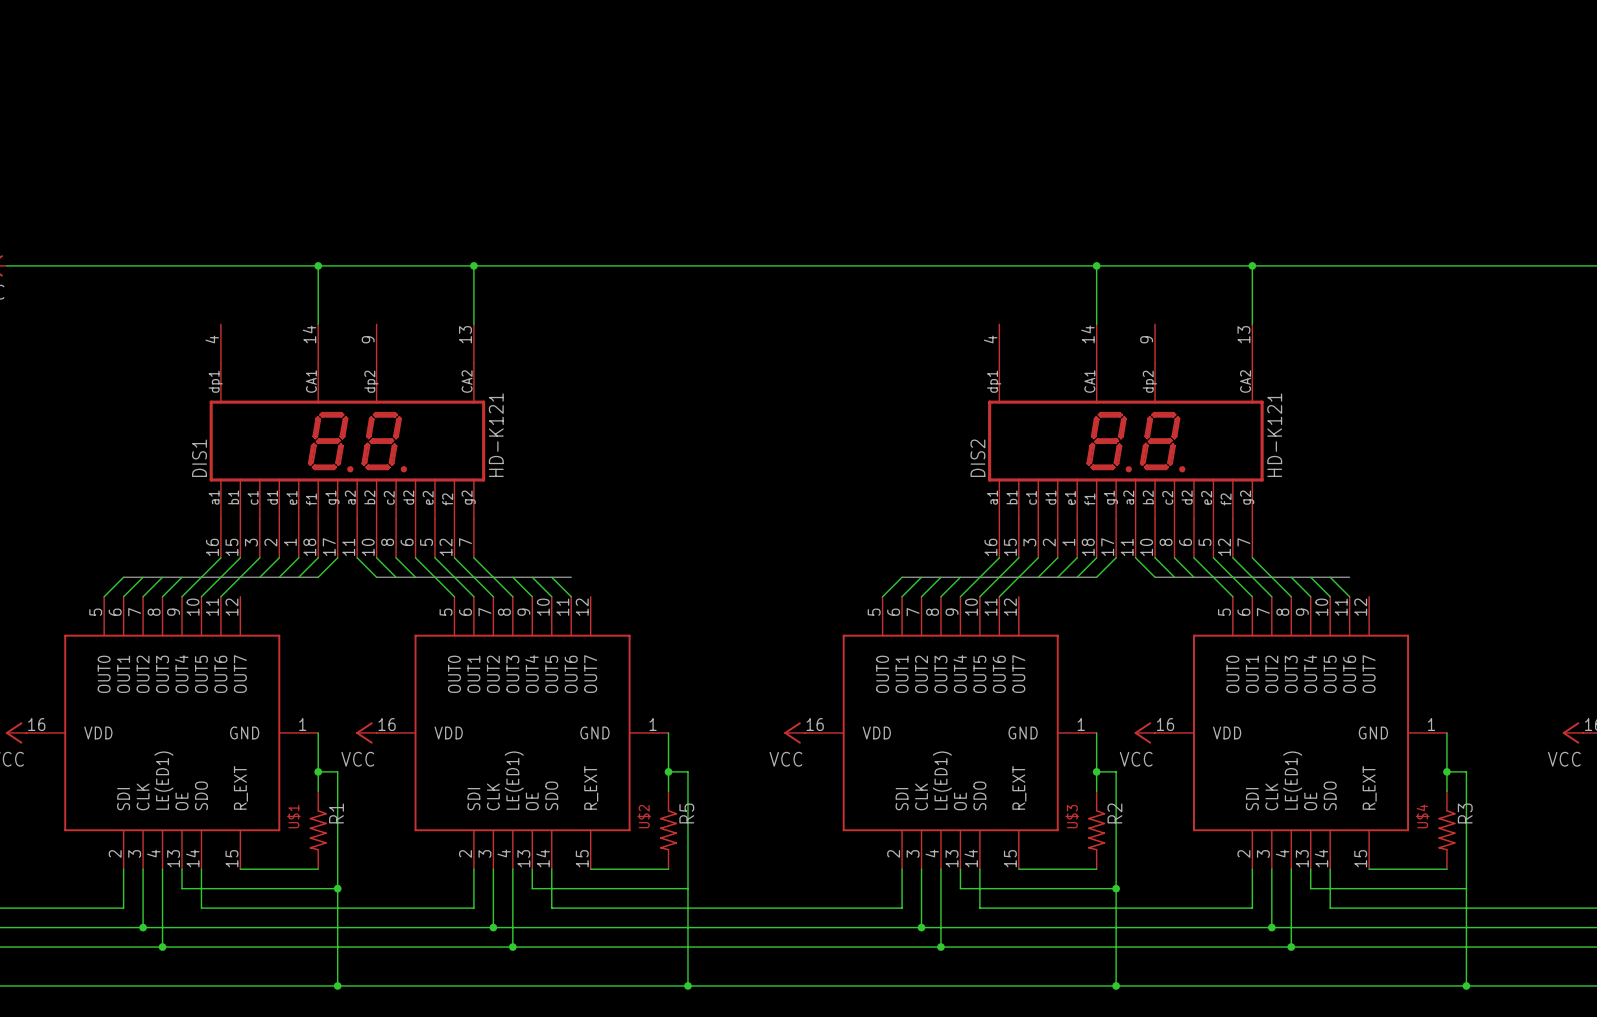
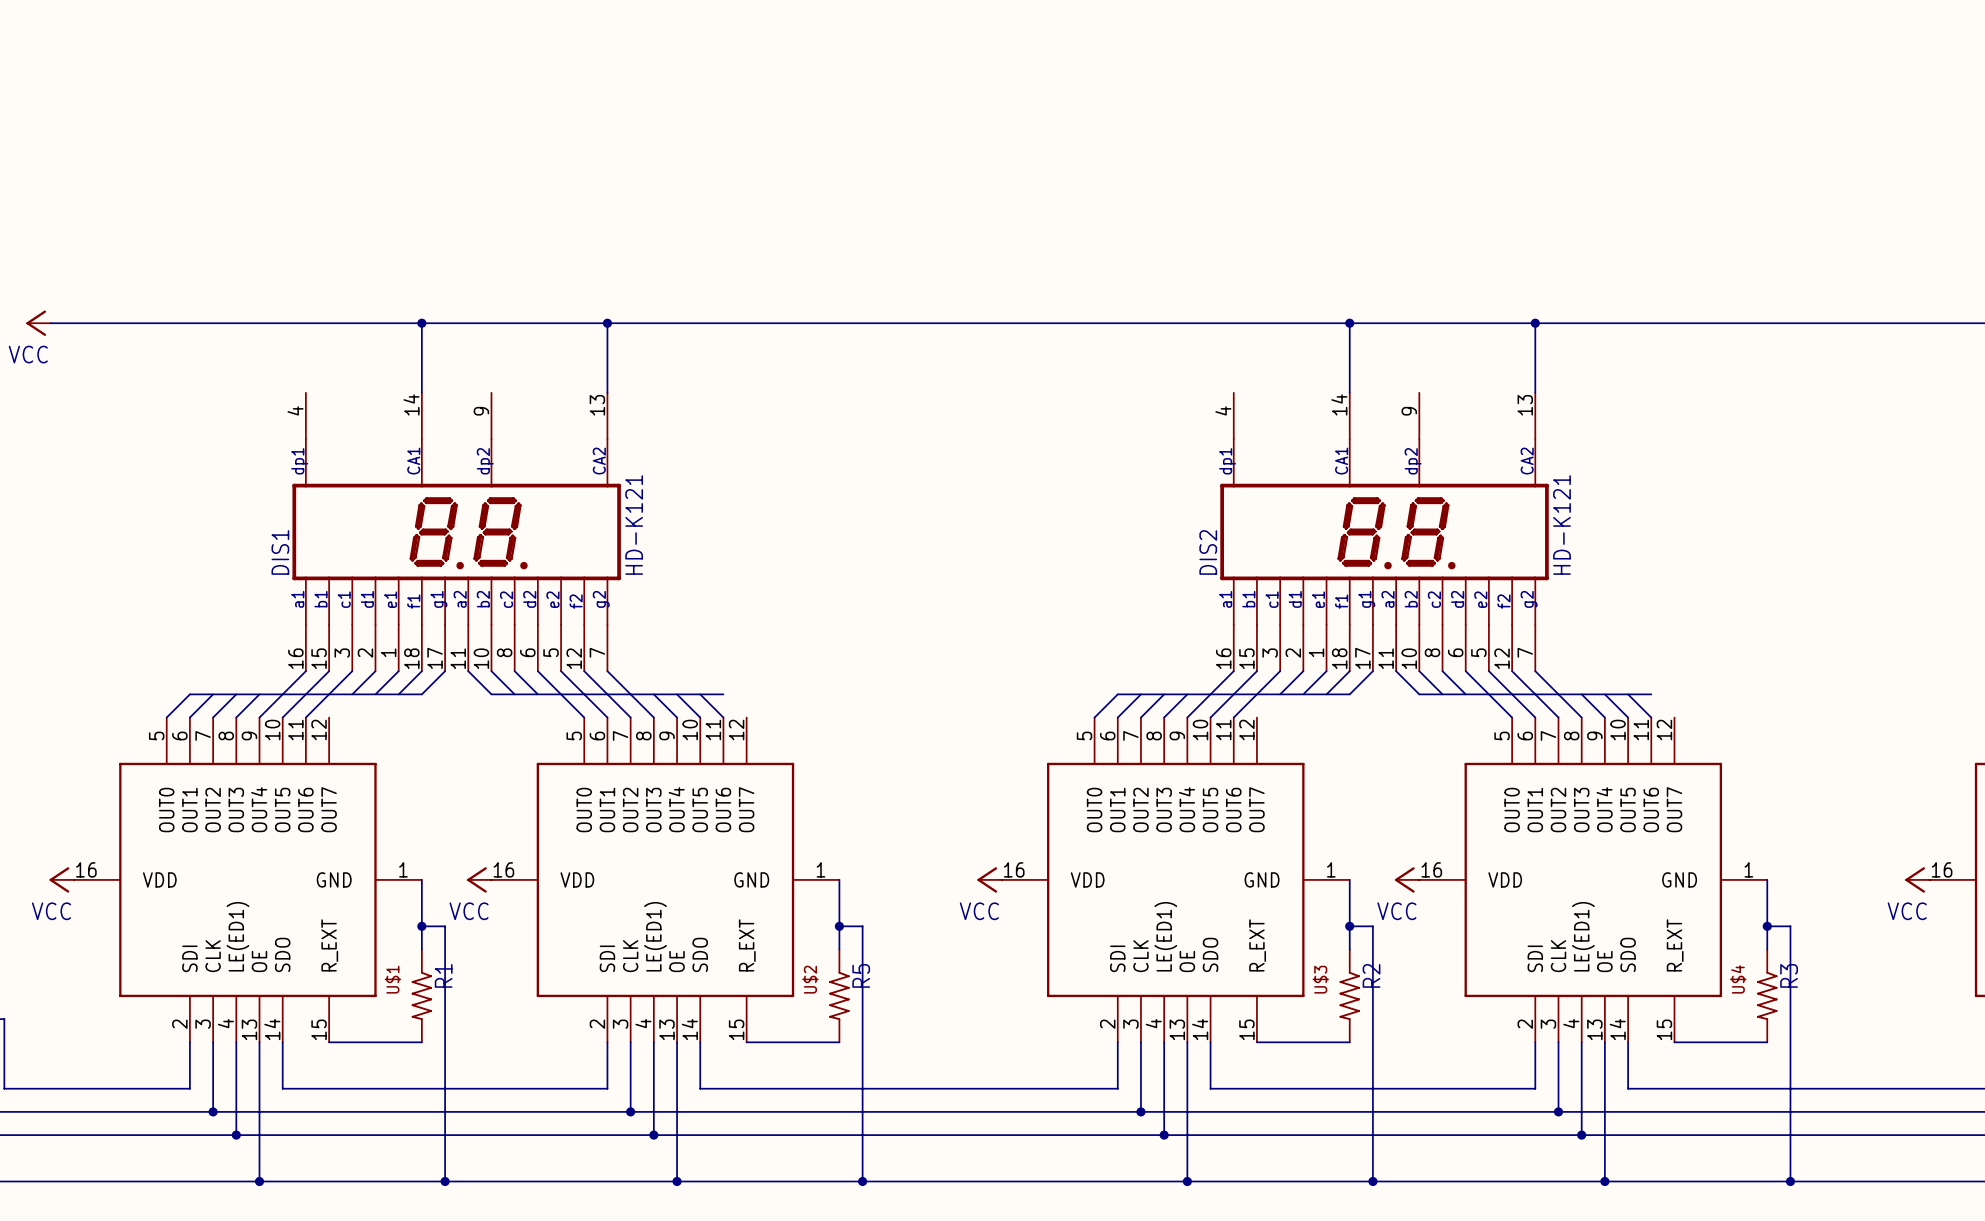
wire: (181, 888) (337, 888) -> (259, 1065) (259, 1181)
junction: (337, 888) -> none
wire: (532, 888) (687, 888) -> (677, 1065) (677, 1181)
wire: (960, 888) (1116, 888) -> (1187, 1065) (1187, 1181)
junction: (1116, 888) -> none
wire: (1310, 888) (1466, 888) -> (1604, 1065) (1604, 1181)
junction: none -> (259, 1181)
junction: none -> (677, 1181)
junction: none -> (1187, 1181)
junction: none -> (1604, 1181)

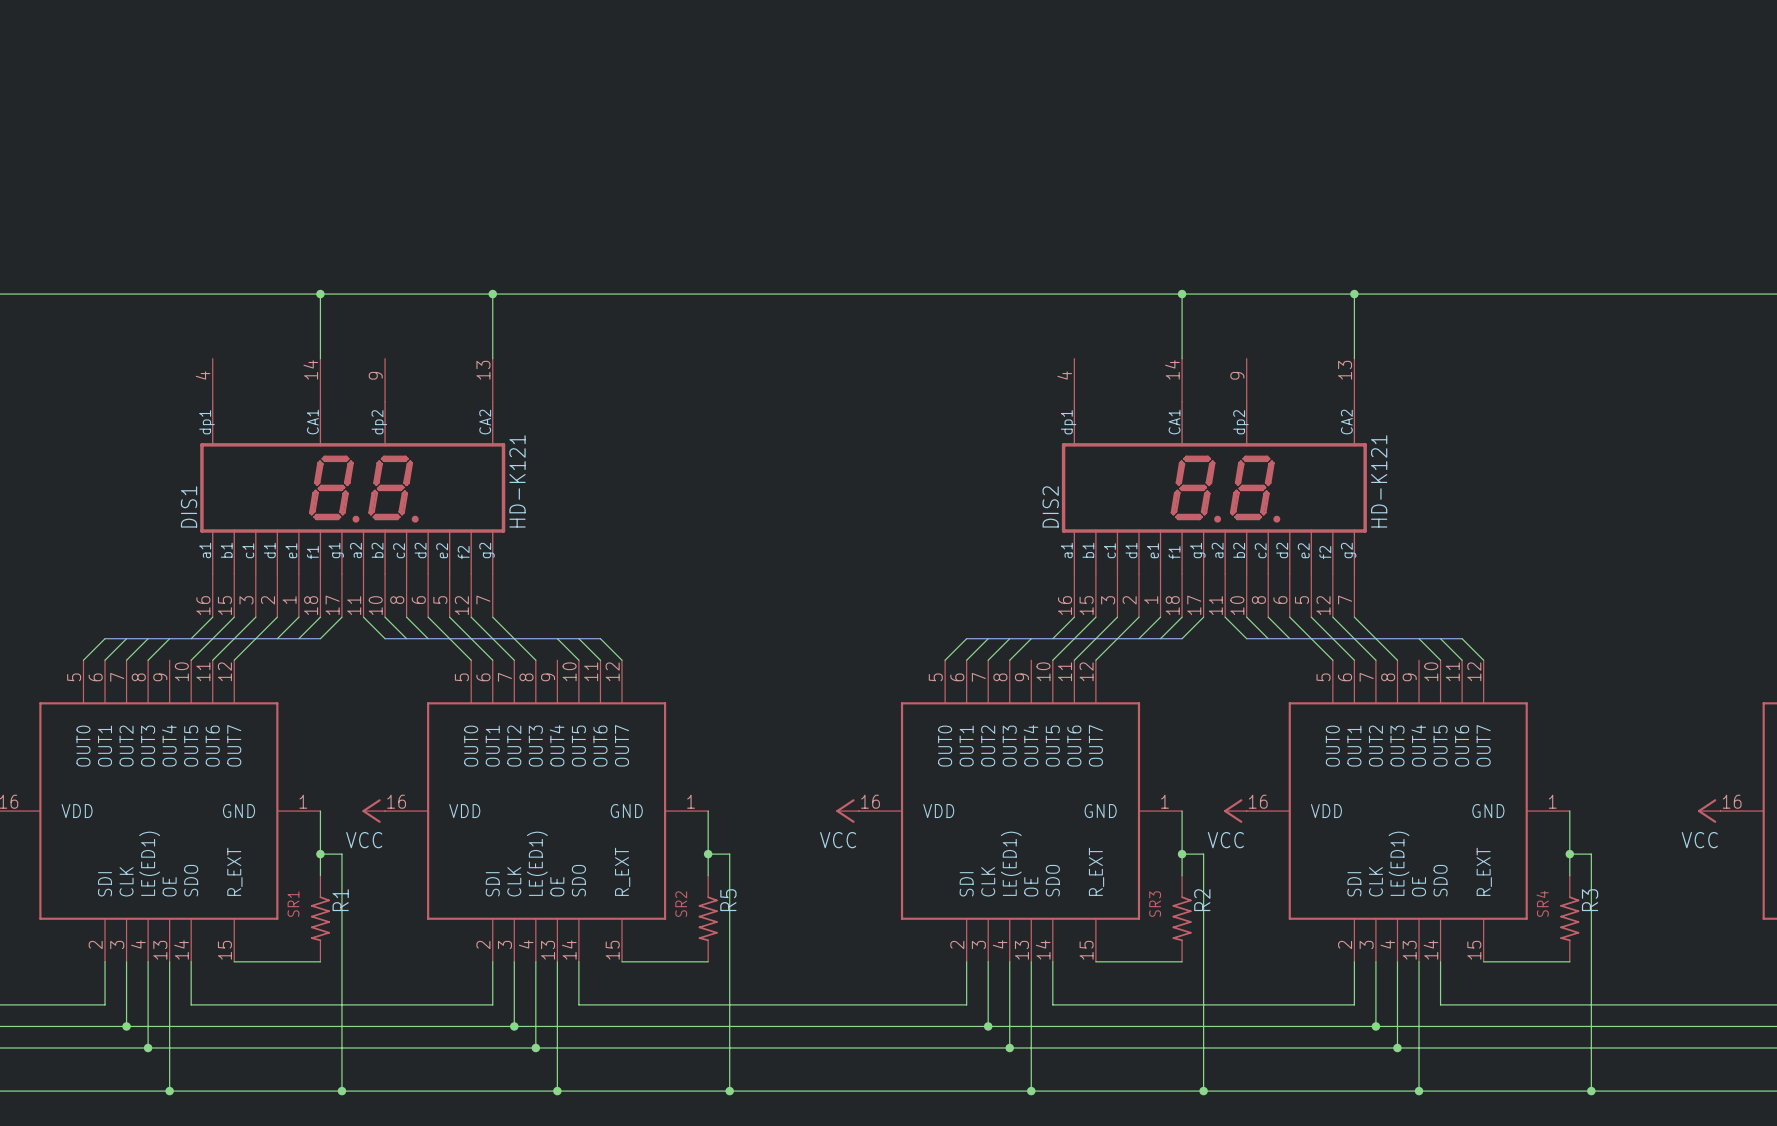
wire: (282, 694) (259, 717) -> (255, 638) (234, 660)
wire: (653, 694) (677, 717) -> (600, 638) (622, 660)
wire: (1210, 694) (1187, 717) -> (1117, 638) (1095, 660)
wire: (1581, 694) (1604, 717) -> (1462, 638) (1483, 660)
U$1 name: U$1 (392, 979) -> SR1 (293, 904)
U$2 name: U$2 (810, 979) -> SR2 (681, 904)
U$3 name: U$3 (1320, 979) -> SR3 (1155, 904)
U$4 name: U$4 (1738, 979) -> SR4 (1542, 903)

